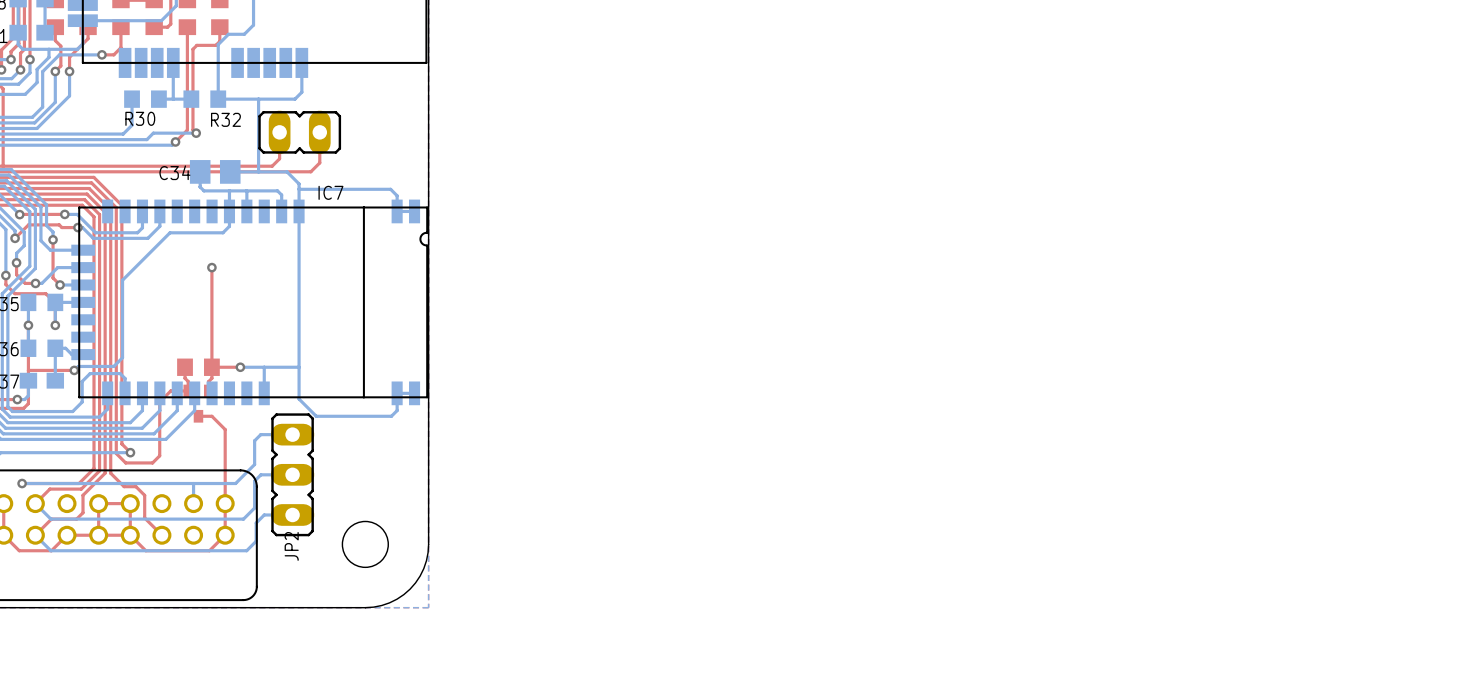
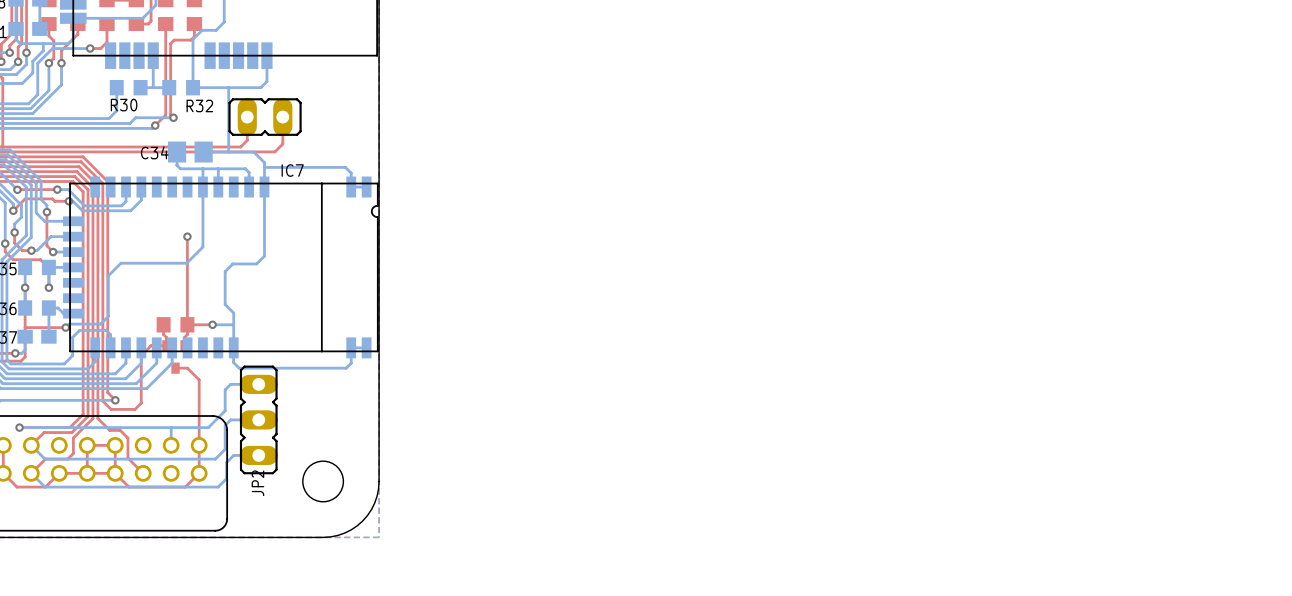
bottom track: (229, 226) (222, 232) (169, 232) (122, 280) (122, 311) -> (202, 200) (202, 247) (186, 263) (120, 263) (108, 275)
bottom track: (299, 289) (299, 399) (316, 416) -> (264, 256) (256, 263) (232, 263) (225, 271) (225, 304) (233, 313) (233, 324)
bottom track: (299, 367) (264, 367) -> none
bottom track: none -> (233, 348) (233, 362) (239, 368) (279, 368)

